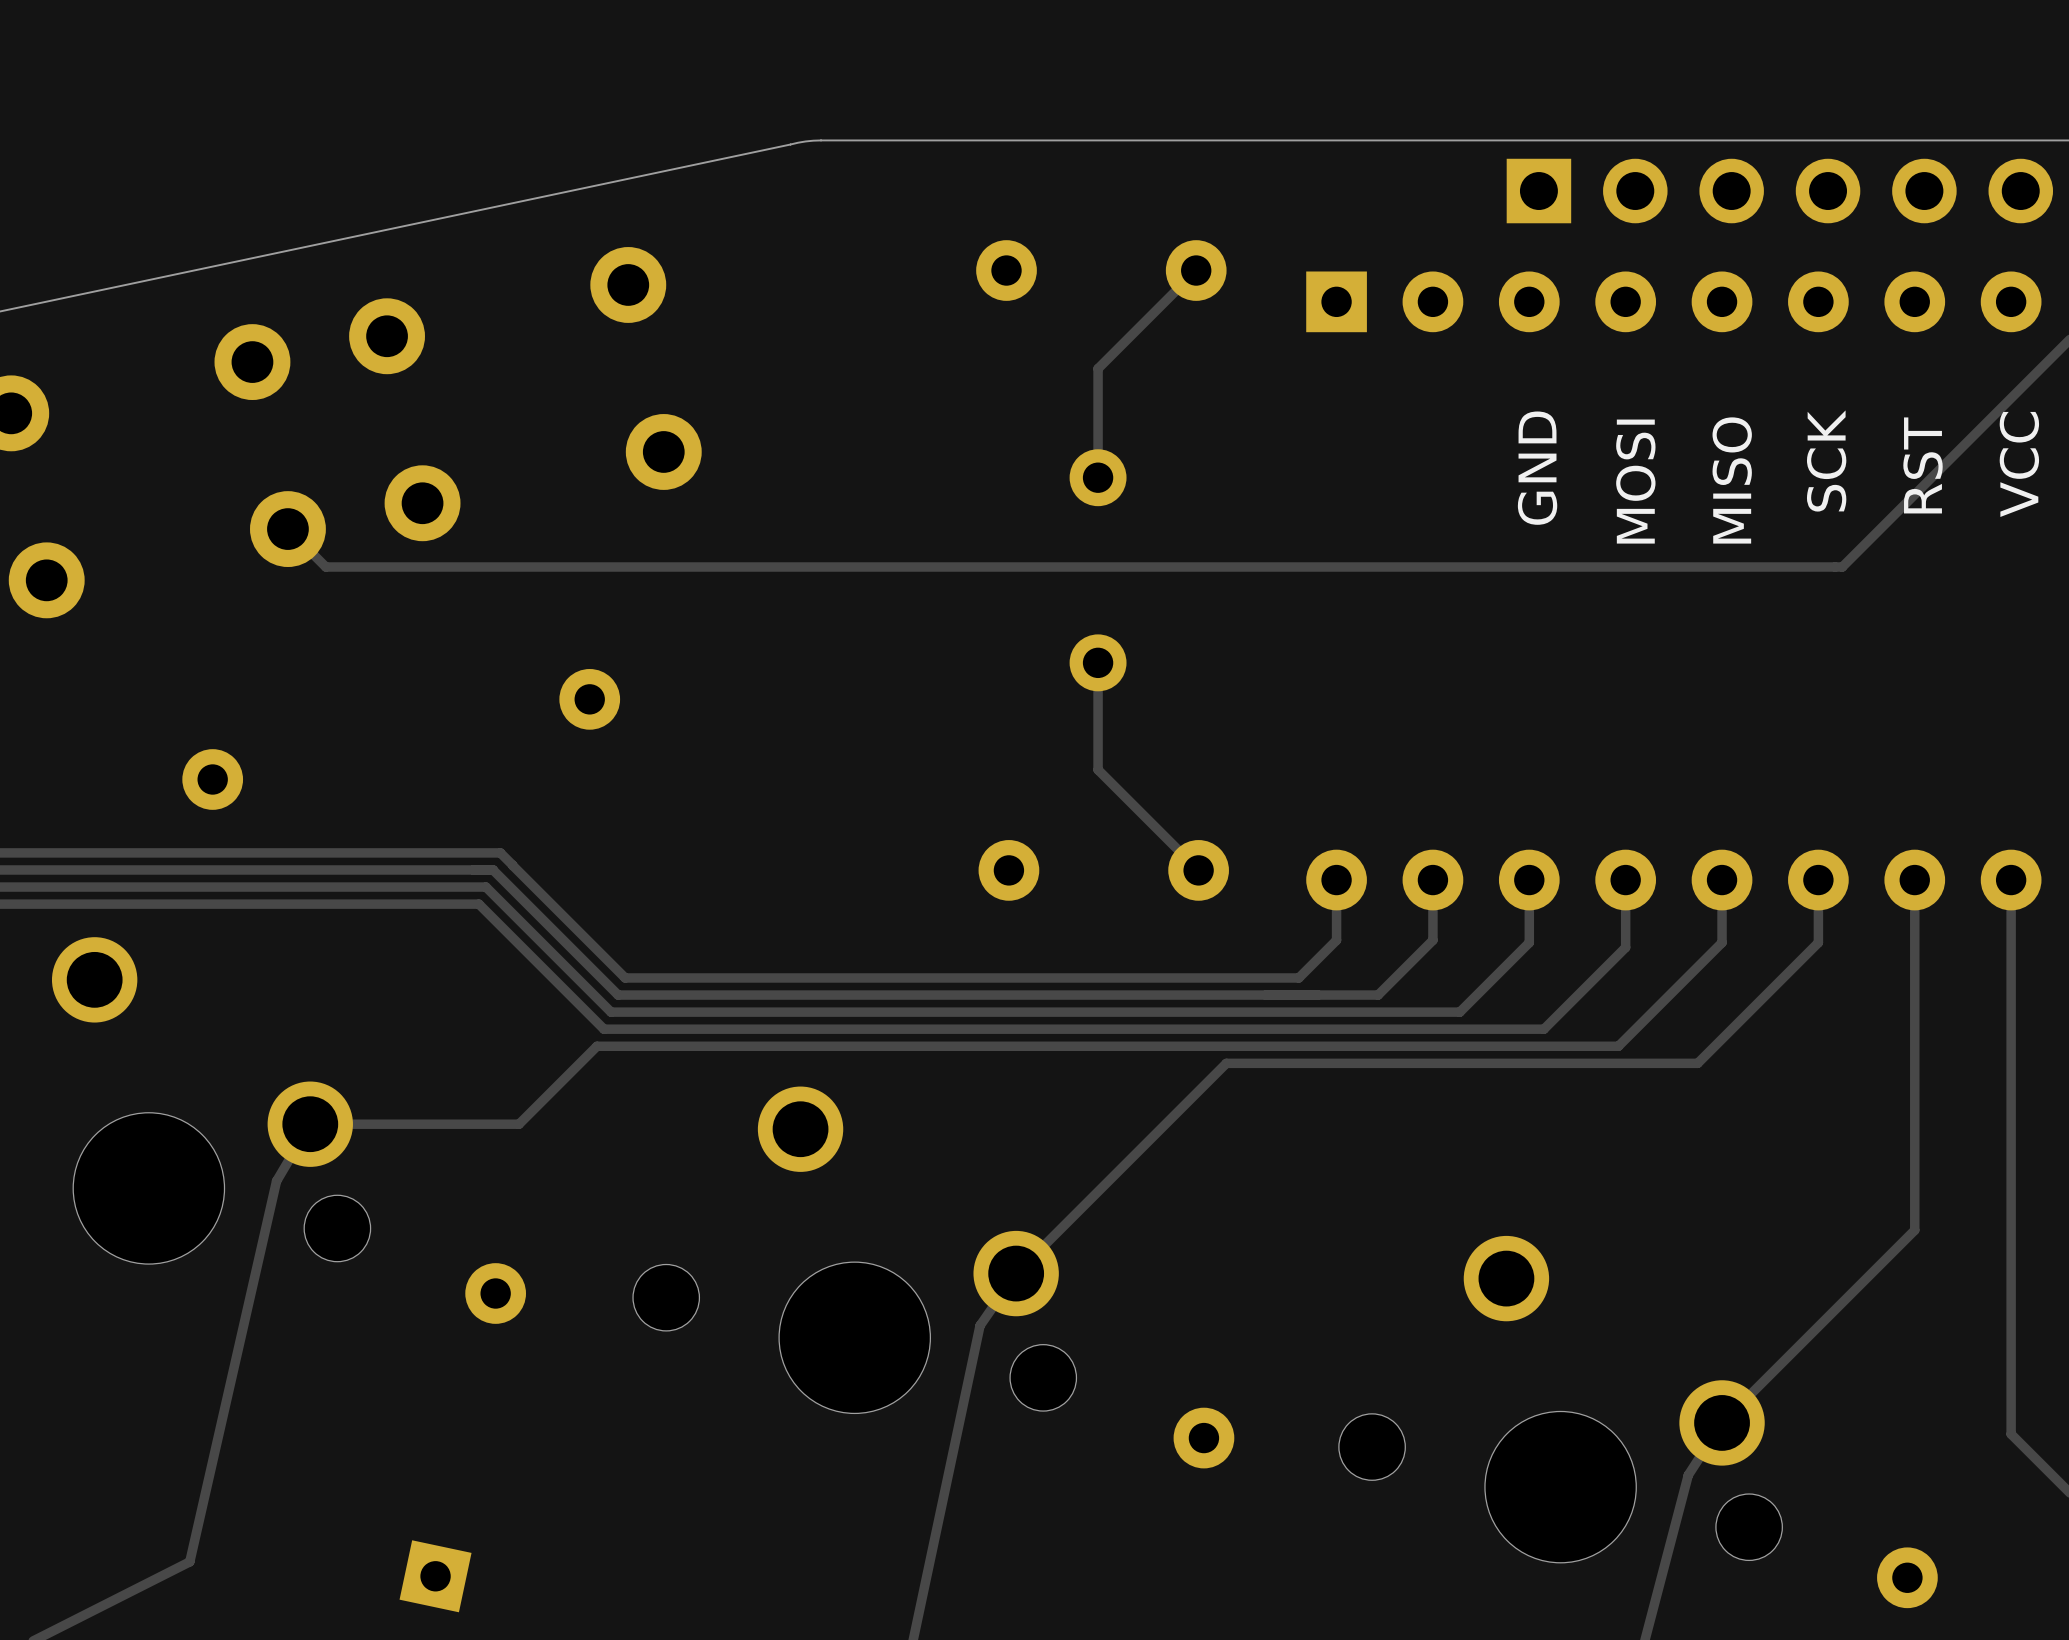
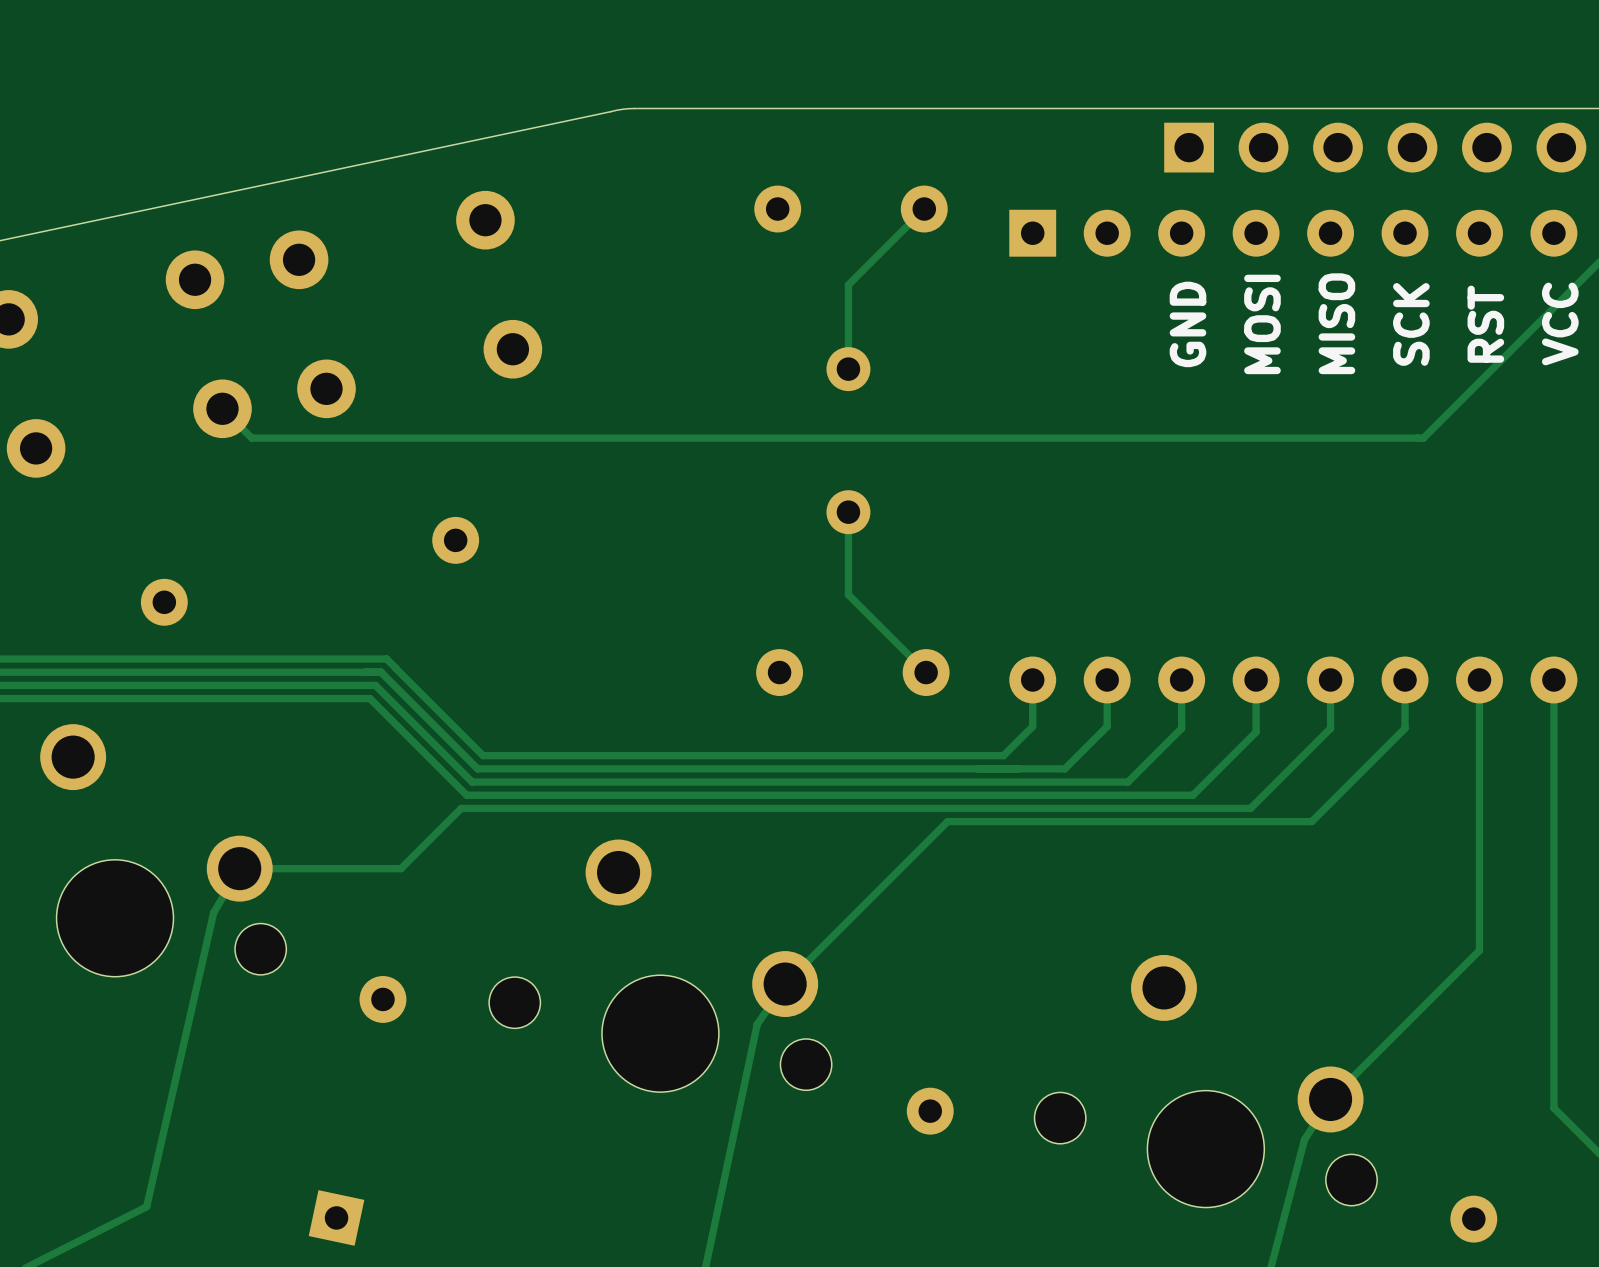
text position: SCK (1826, 460) -> SCK (1411, 324)
text position: VCC (2019, 464) -> VCC (1560, 323)
text position: RST (1923, 465) -> RST (1485, 324)
text position: GND (1537, 468) -> GND (1188, 324)
text position: MISO (1732, 480) -> MISO (1336, 323)
text position: MOSI (1635, 481) -> MOSI (1262, 324)

